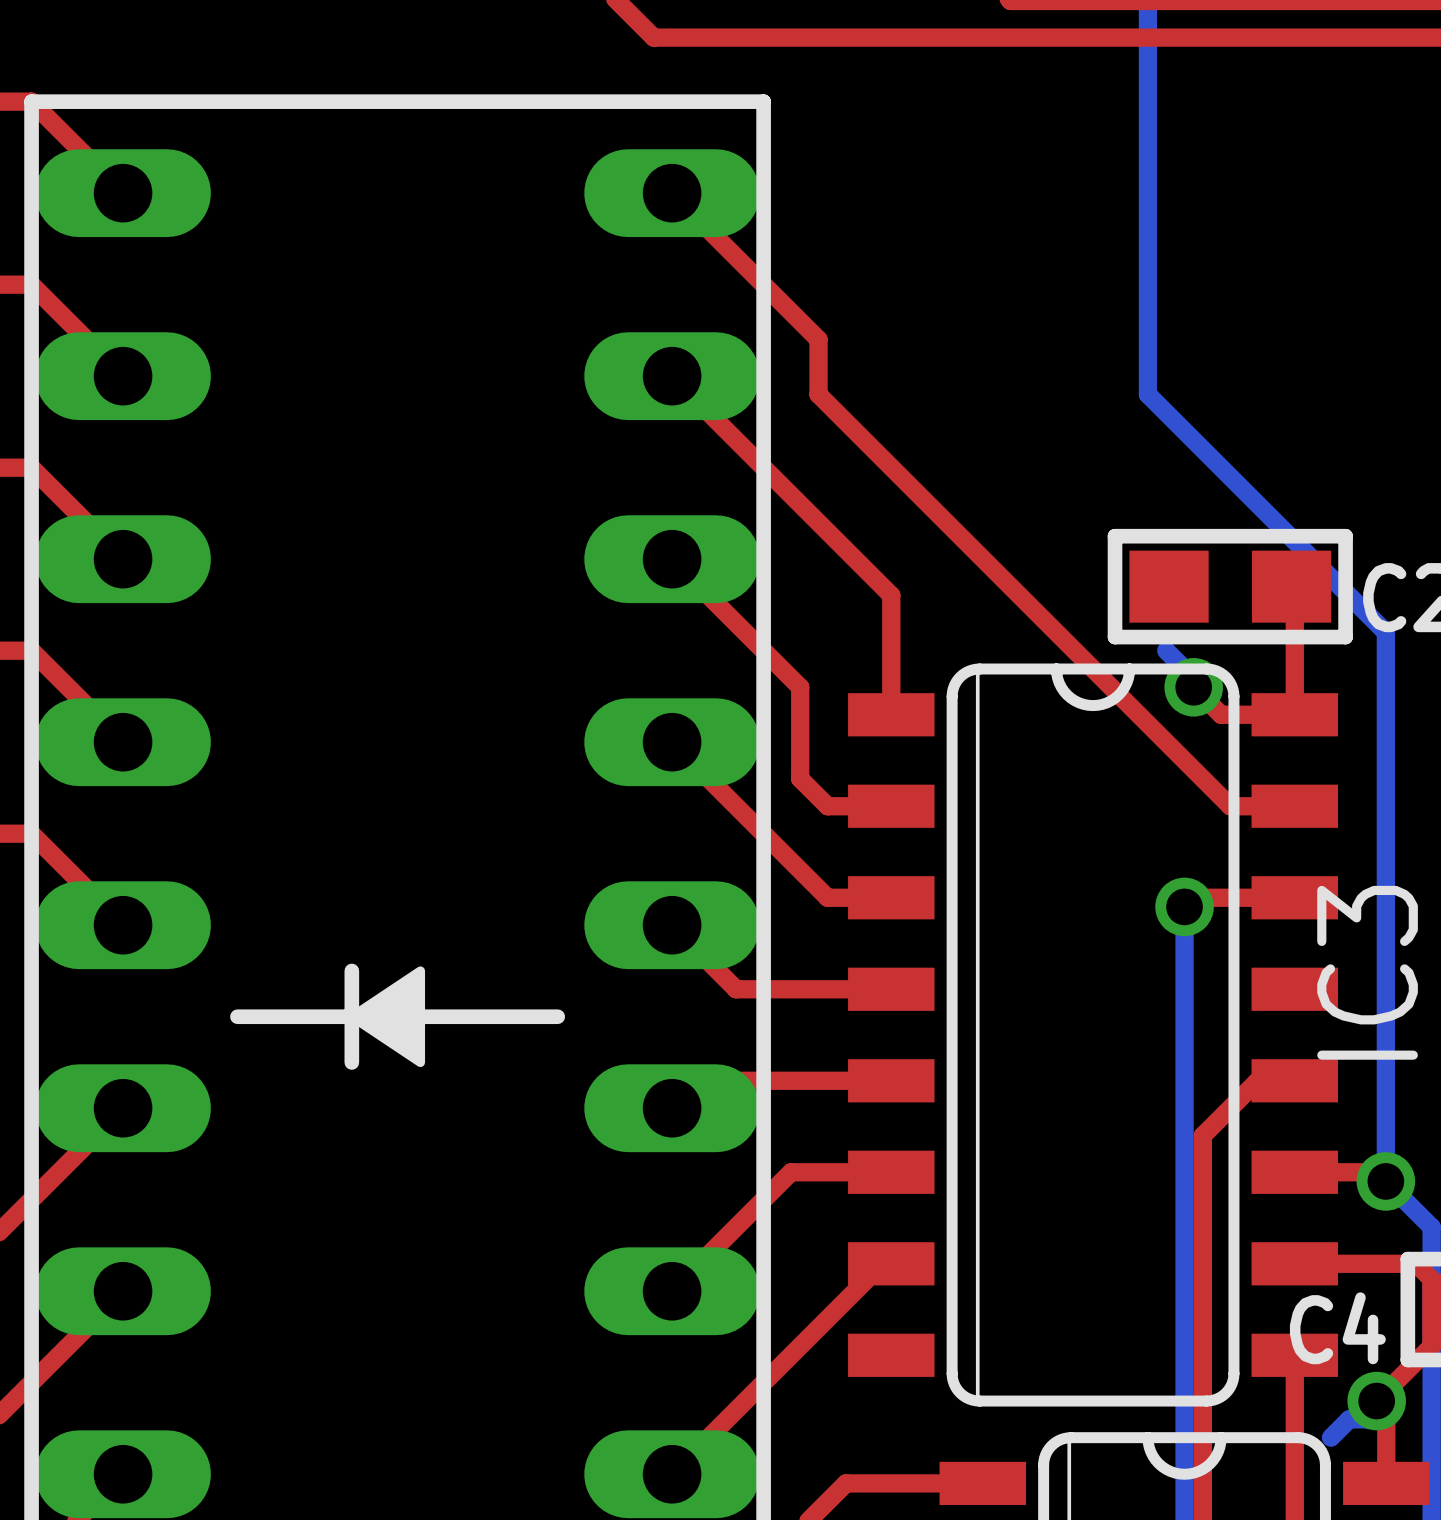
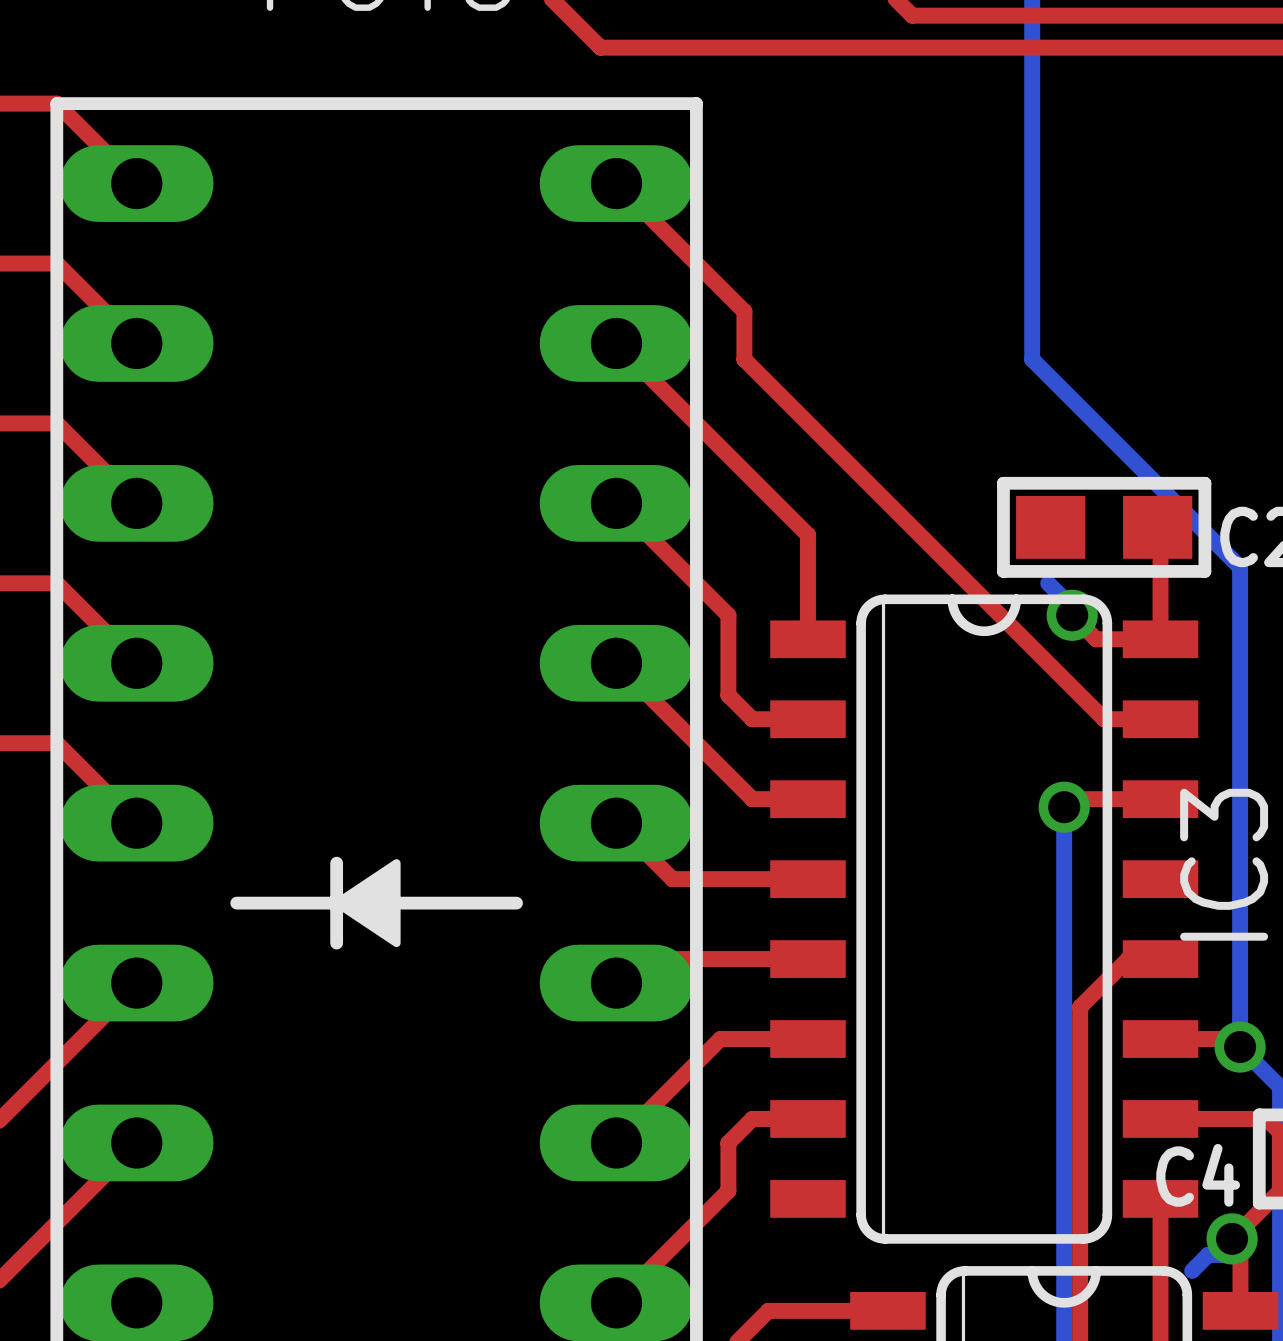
top track: (882, 1263) (800, 1346) -> (800, 1118) (752, 1118) (728, 1142) (728, 1190)

